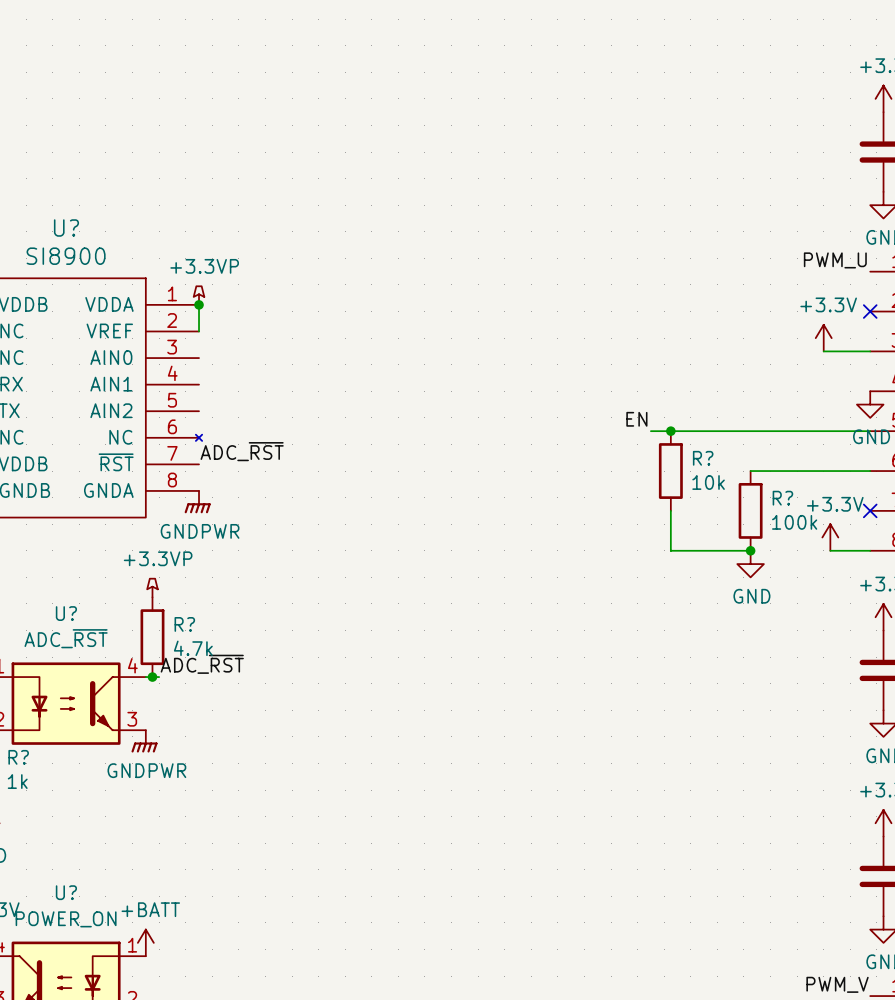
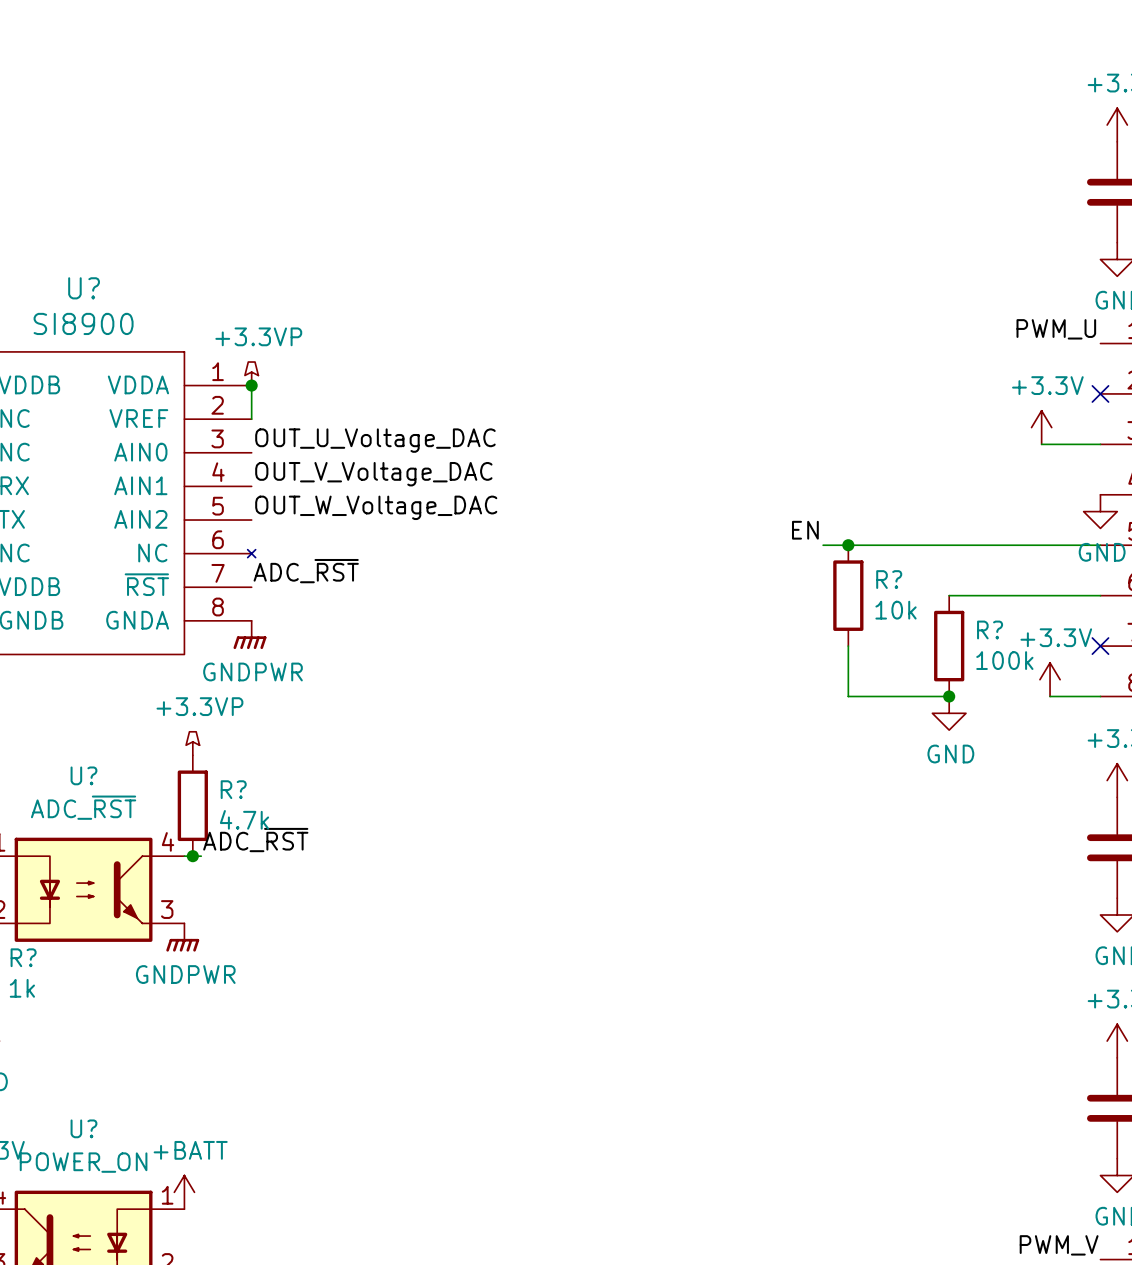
label: none -> OUT_U_Voltage_DAC (375, 440)
label: none -> OUT_V_Voltage_DAC (373, 474)
label: none -> OUT_W_Voltage_DAC (376, 507)

